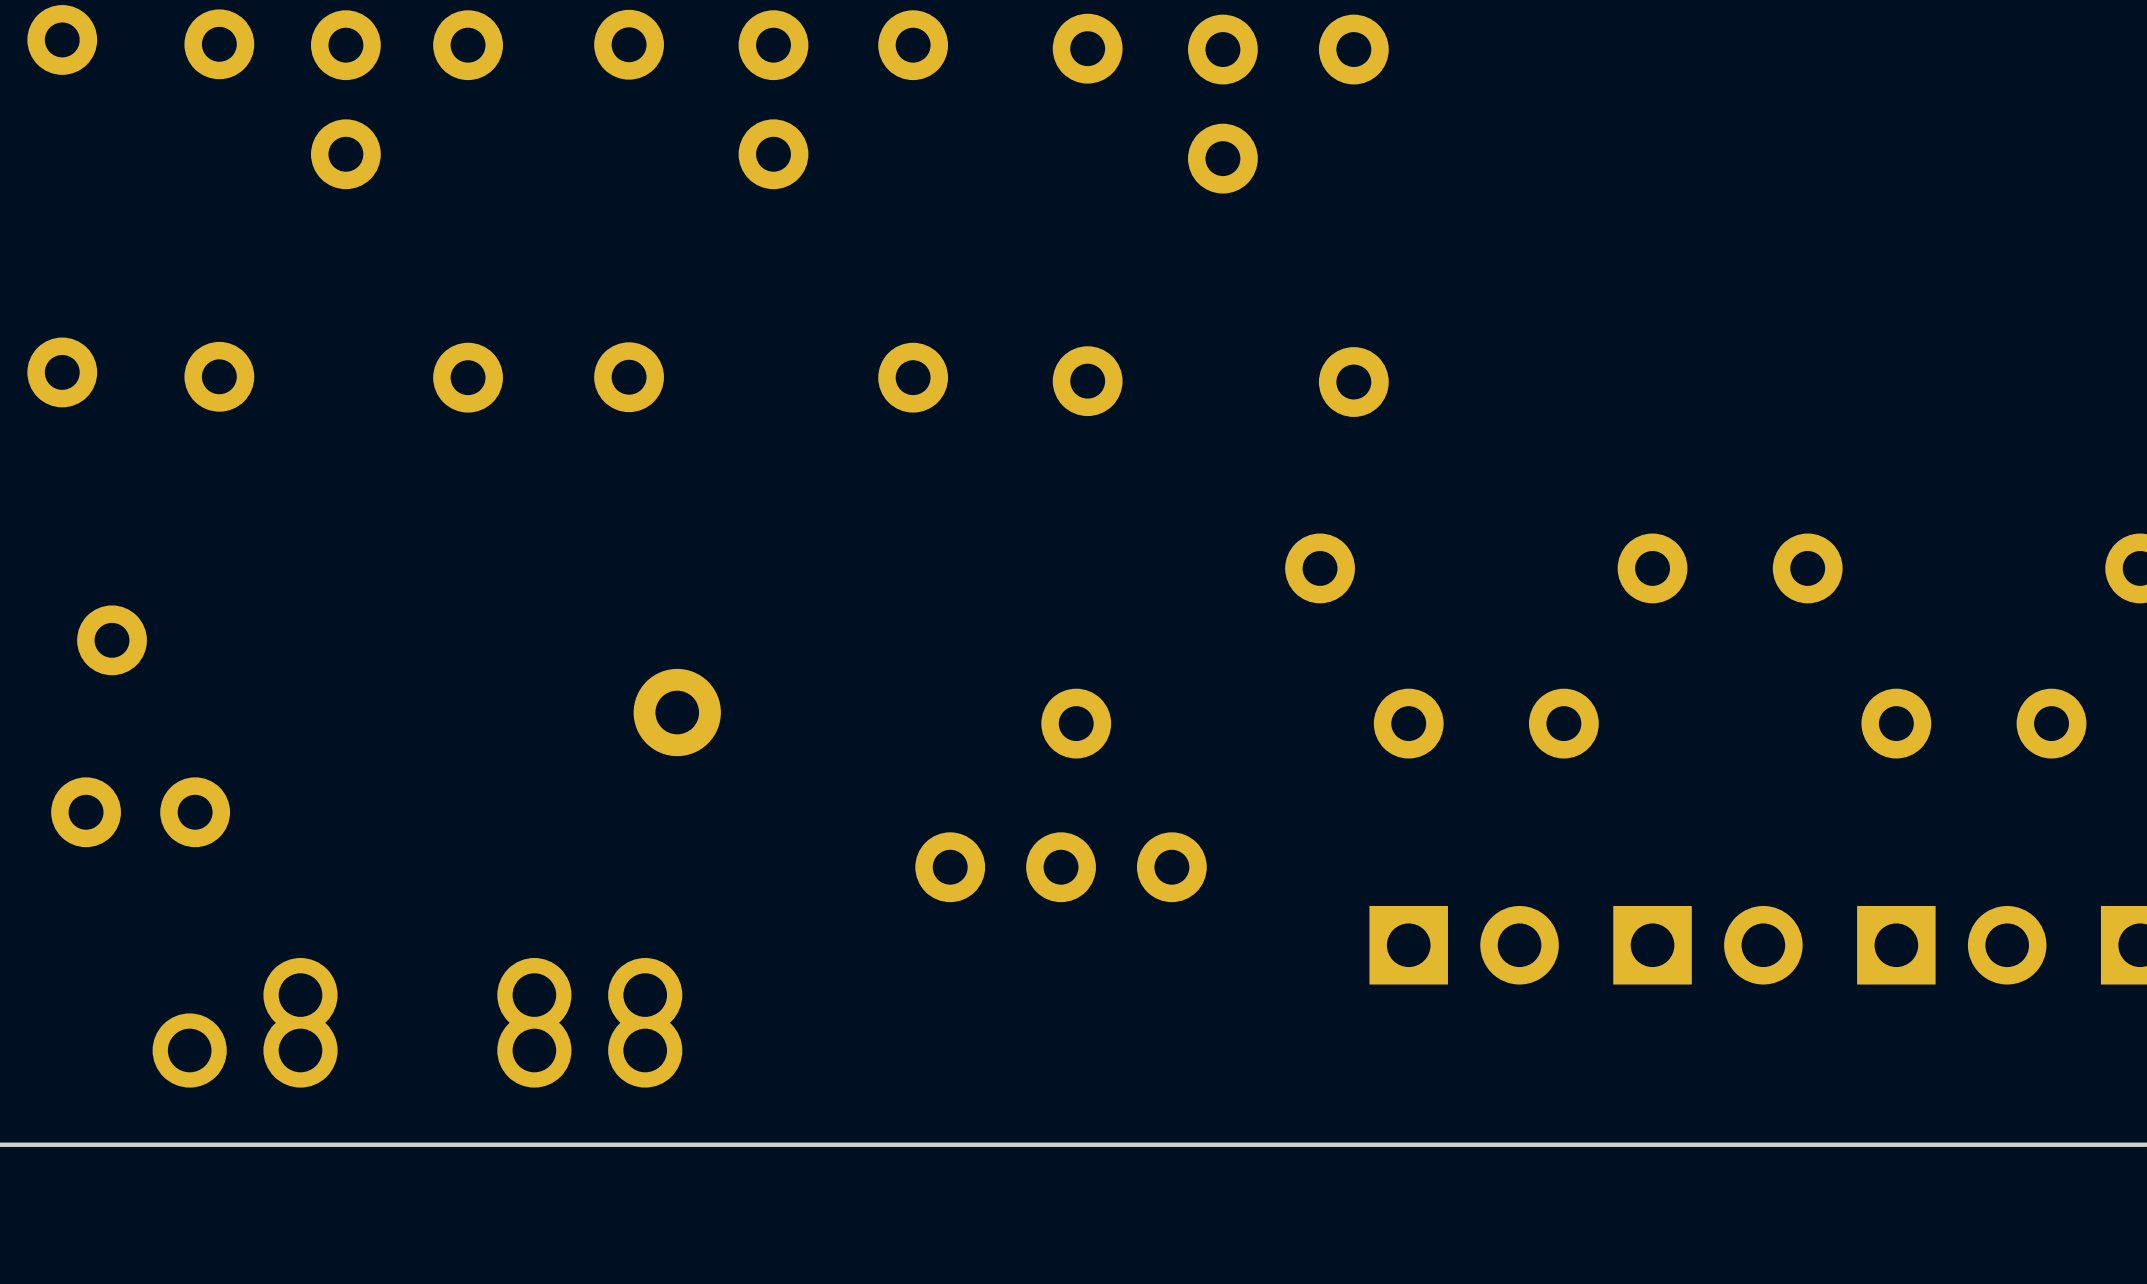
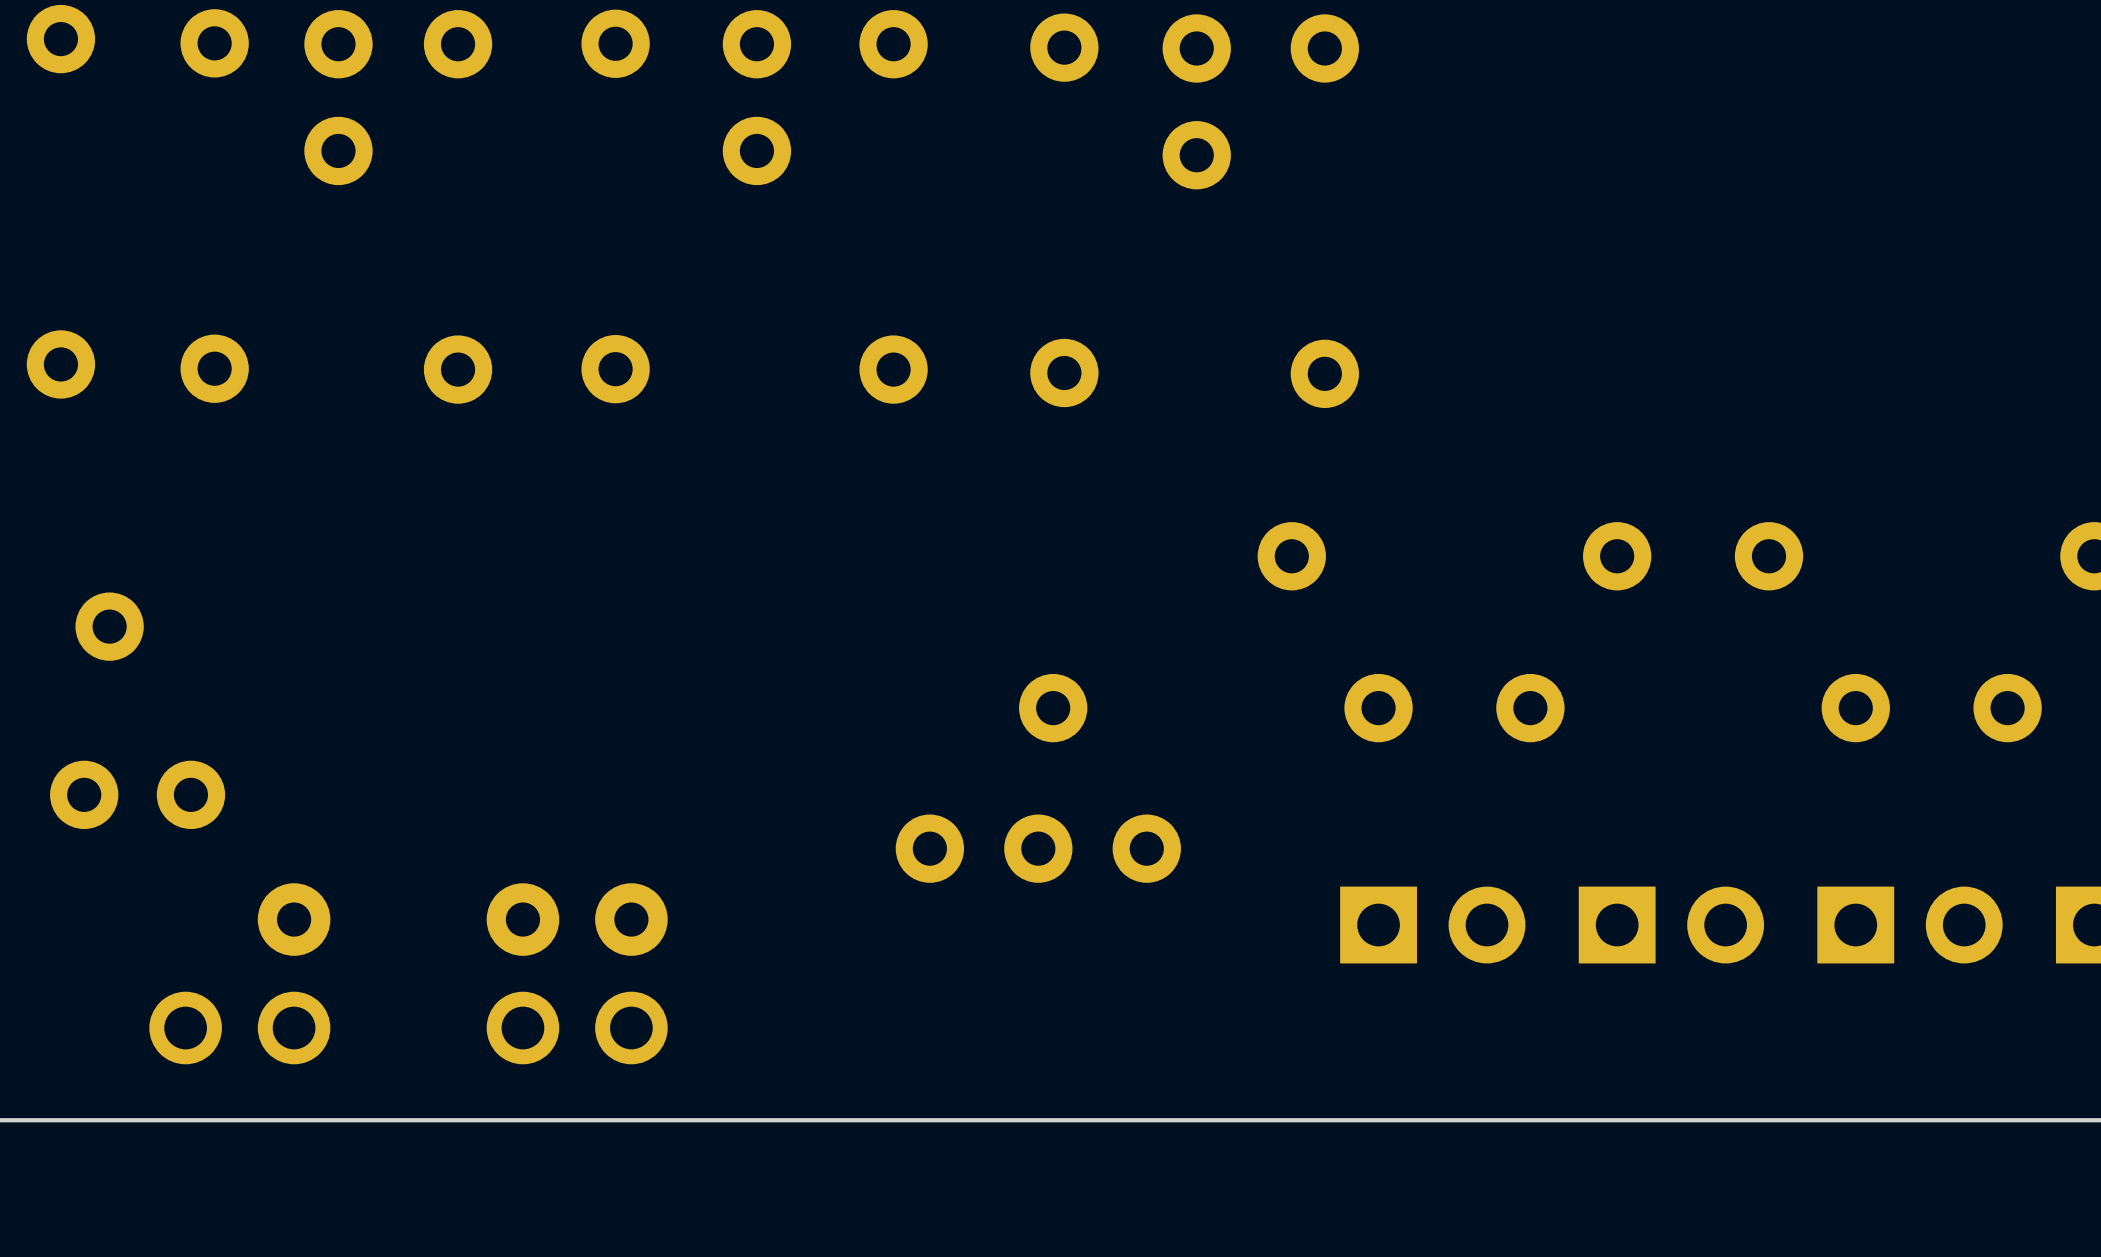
part: (677, 712) -> none
part footprint: [152, 957, 338, 1088] -> [149, 883, 331, 1065]
part footprint: [497, 957, 683, 1088] -> [486, 883, 668, 1065]

